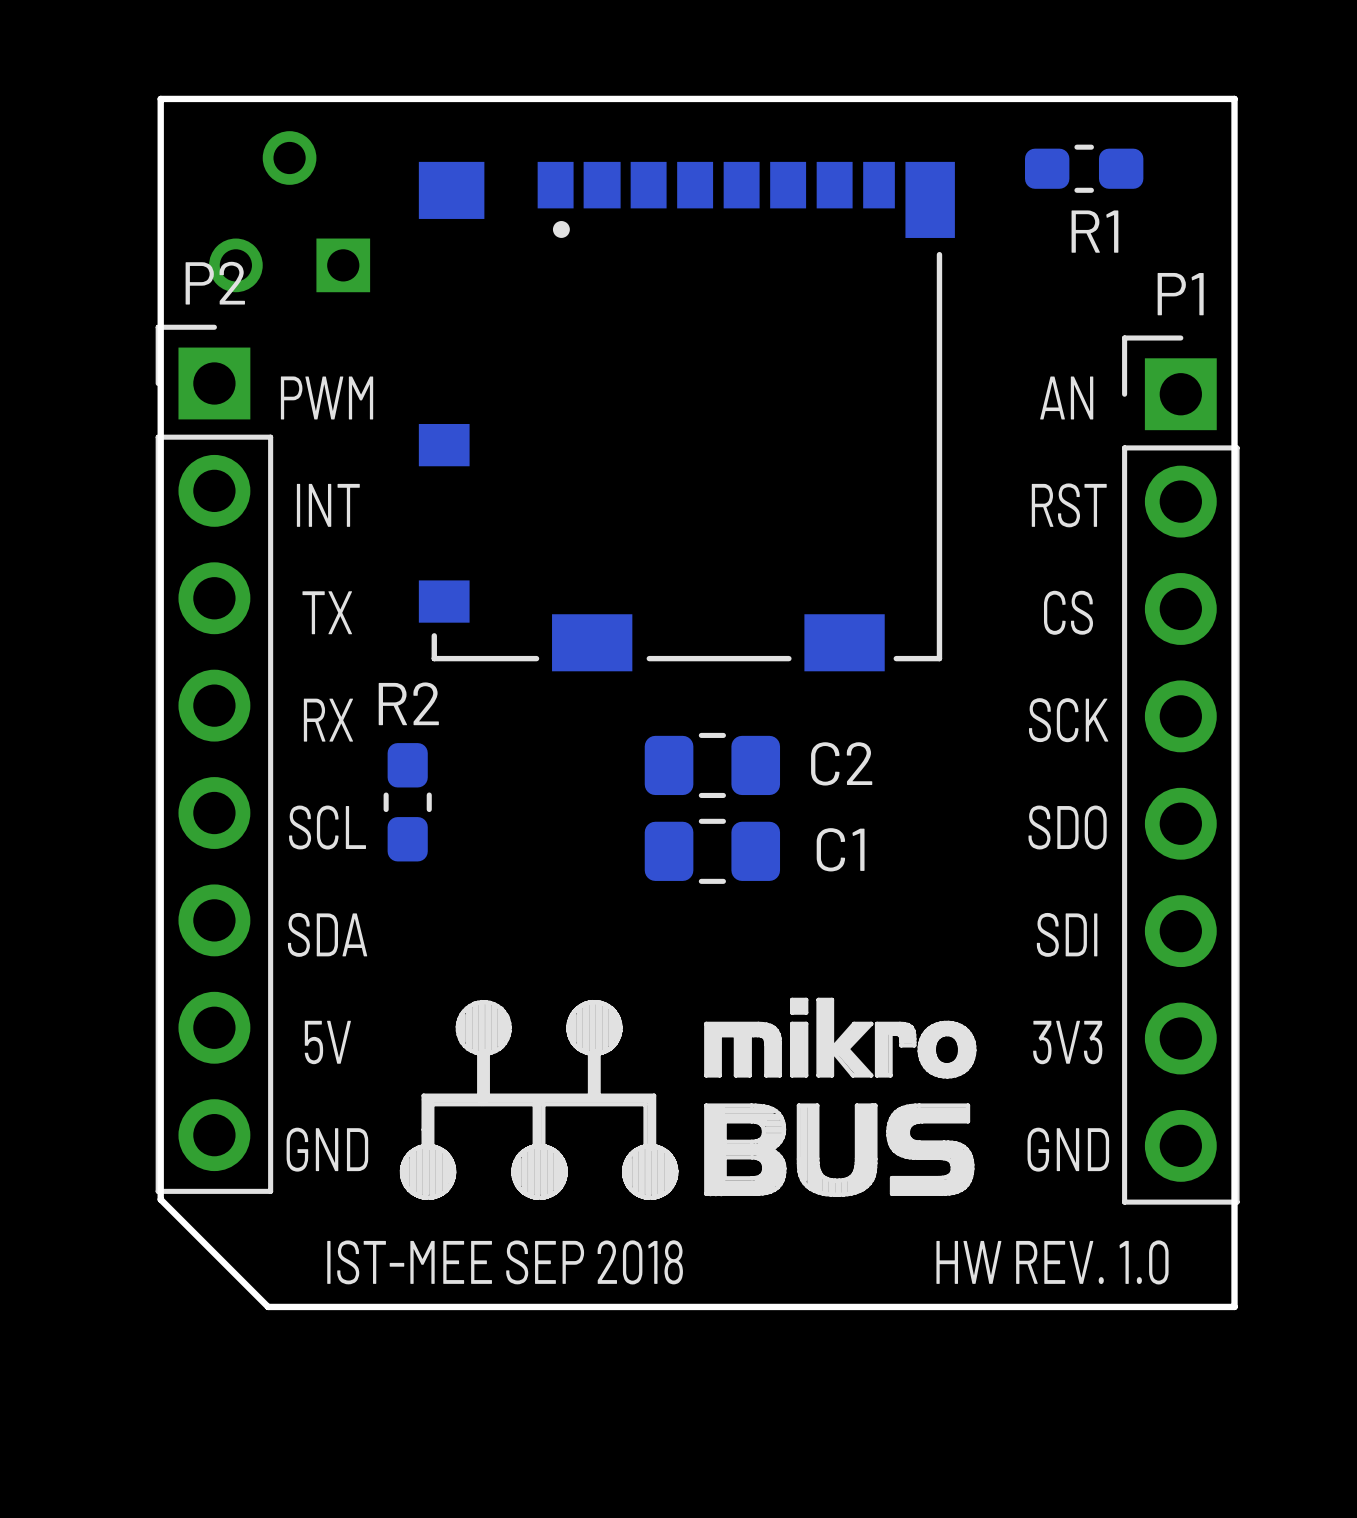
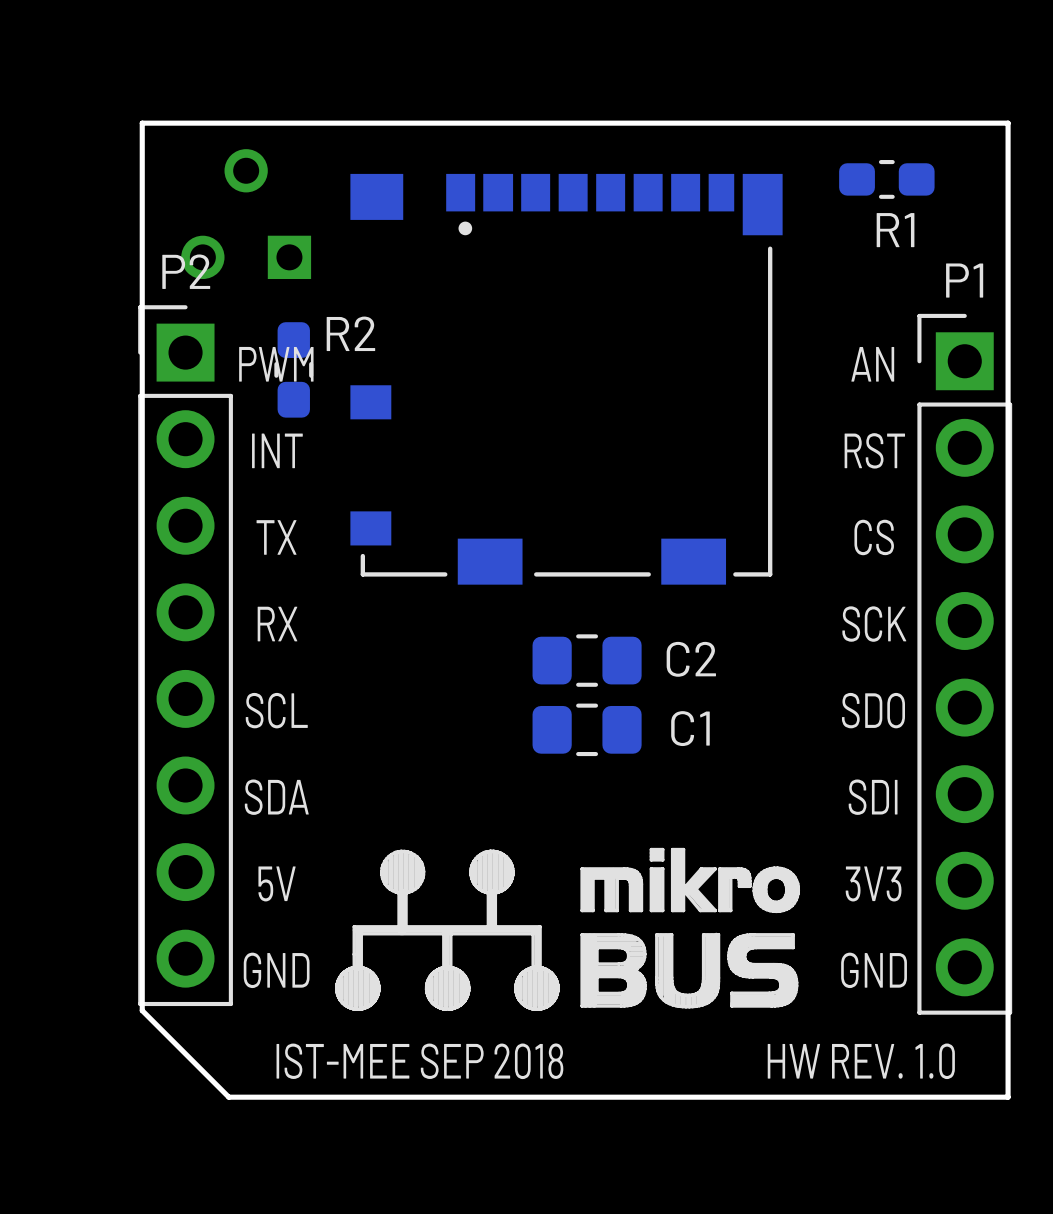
R2 name position: R2 (408, 703) -> R2 (350, 333)
R2 position: (407, 802) -> (293, 369)

